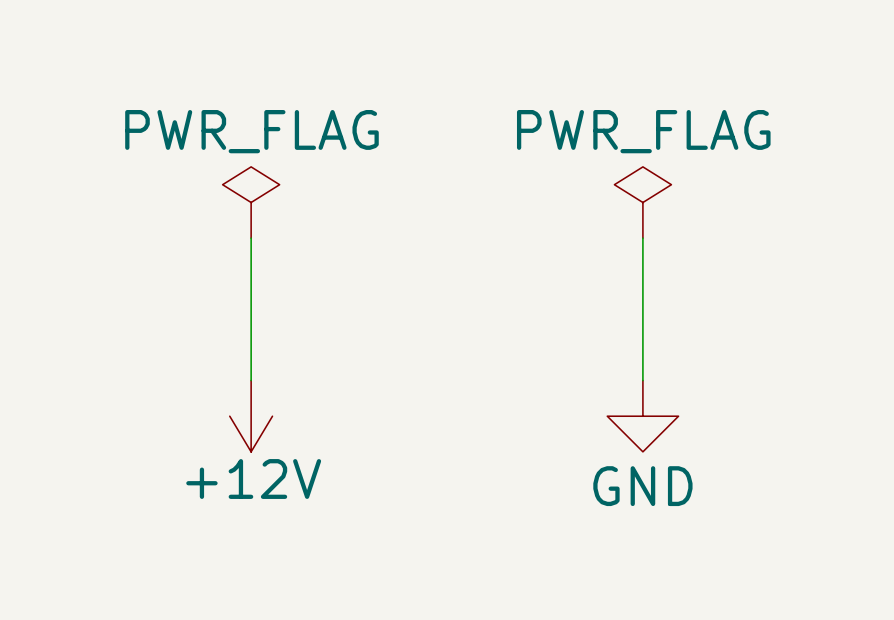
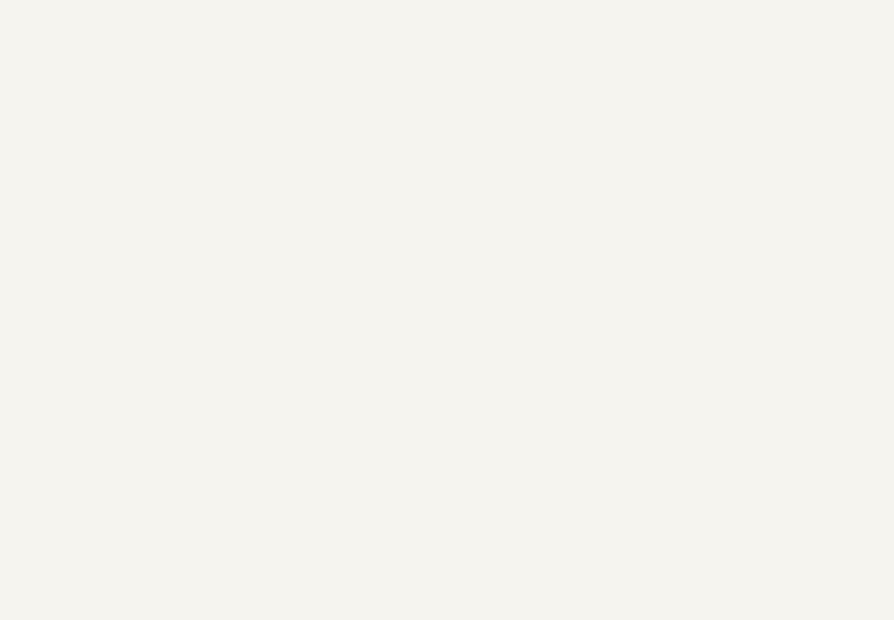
power symbol: PWR_FLAG (251, 202) -> none
power symbol: PWR_FLAG (642, 202) -> none
wire: (251, 238) (251, 380) -> none
wire: (642, 238) (642, 380) -> none
power symbol: +12V (251, 416) -> none
power symbol: GND (642, 416) -> none

